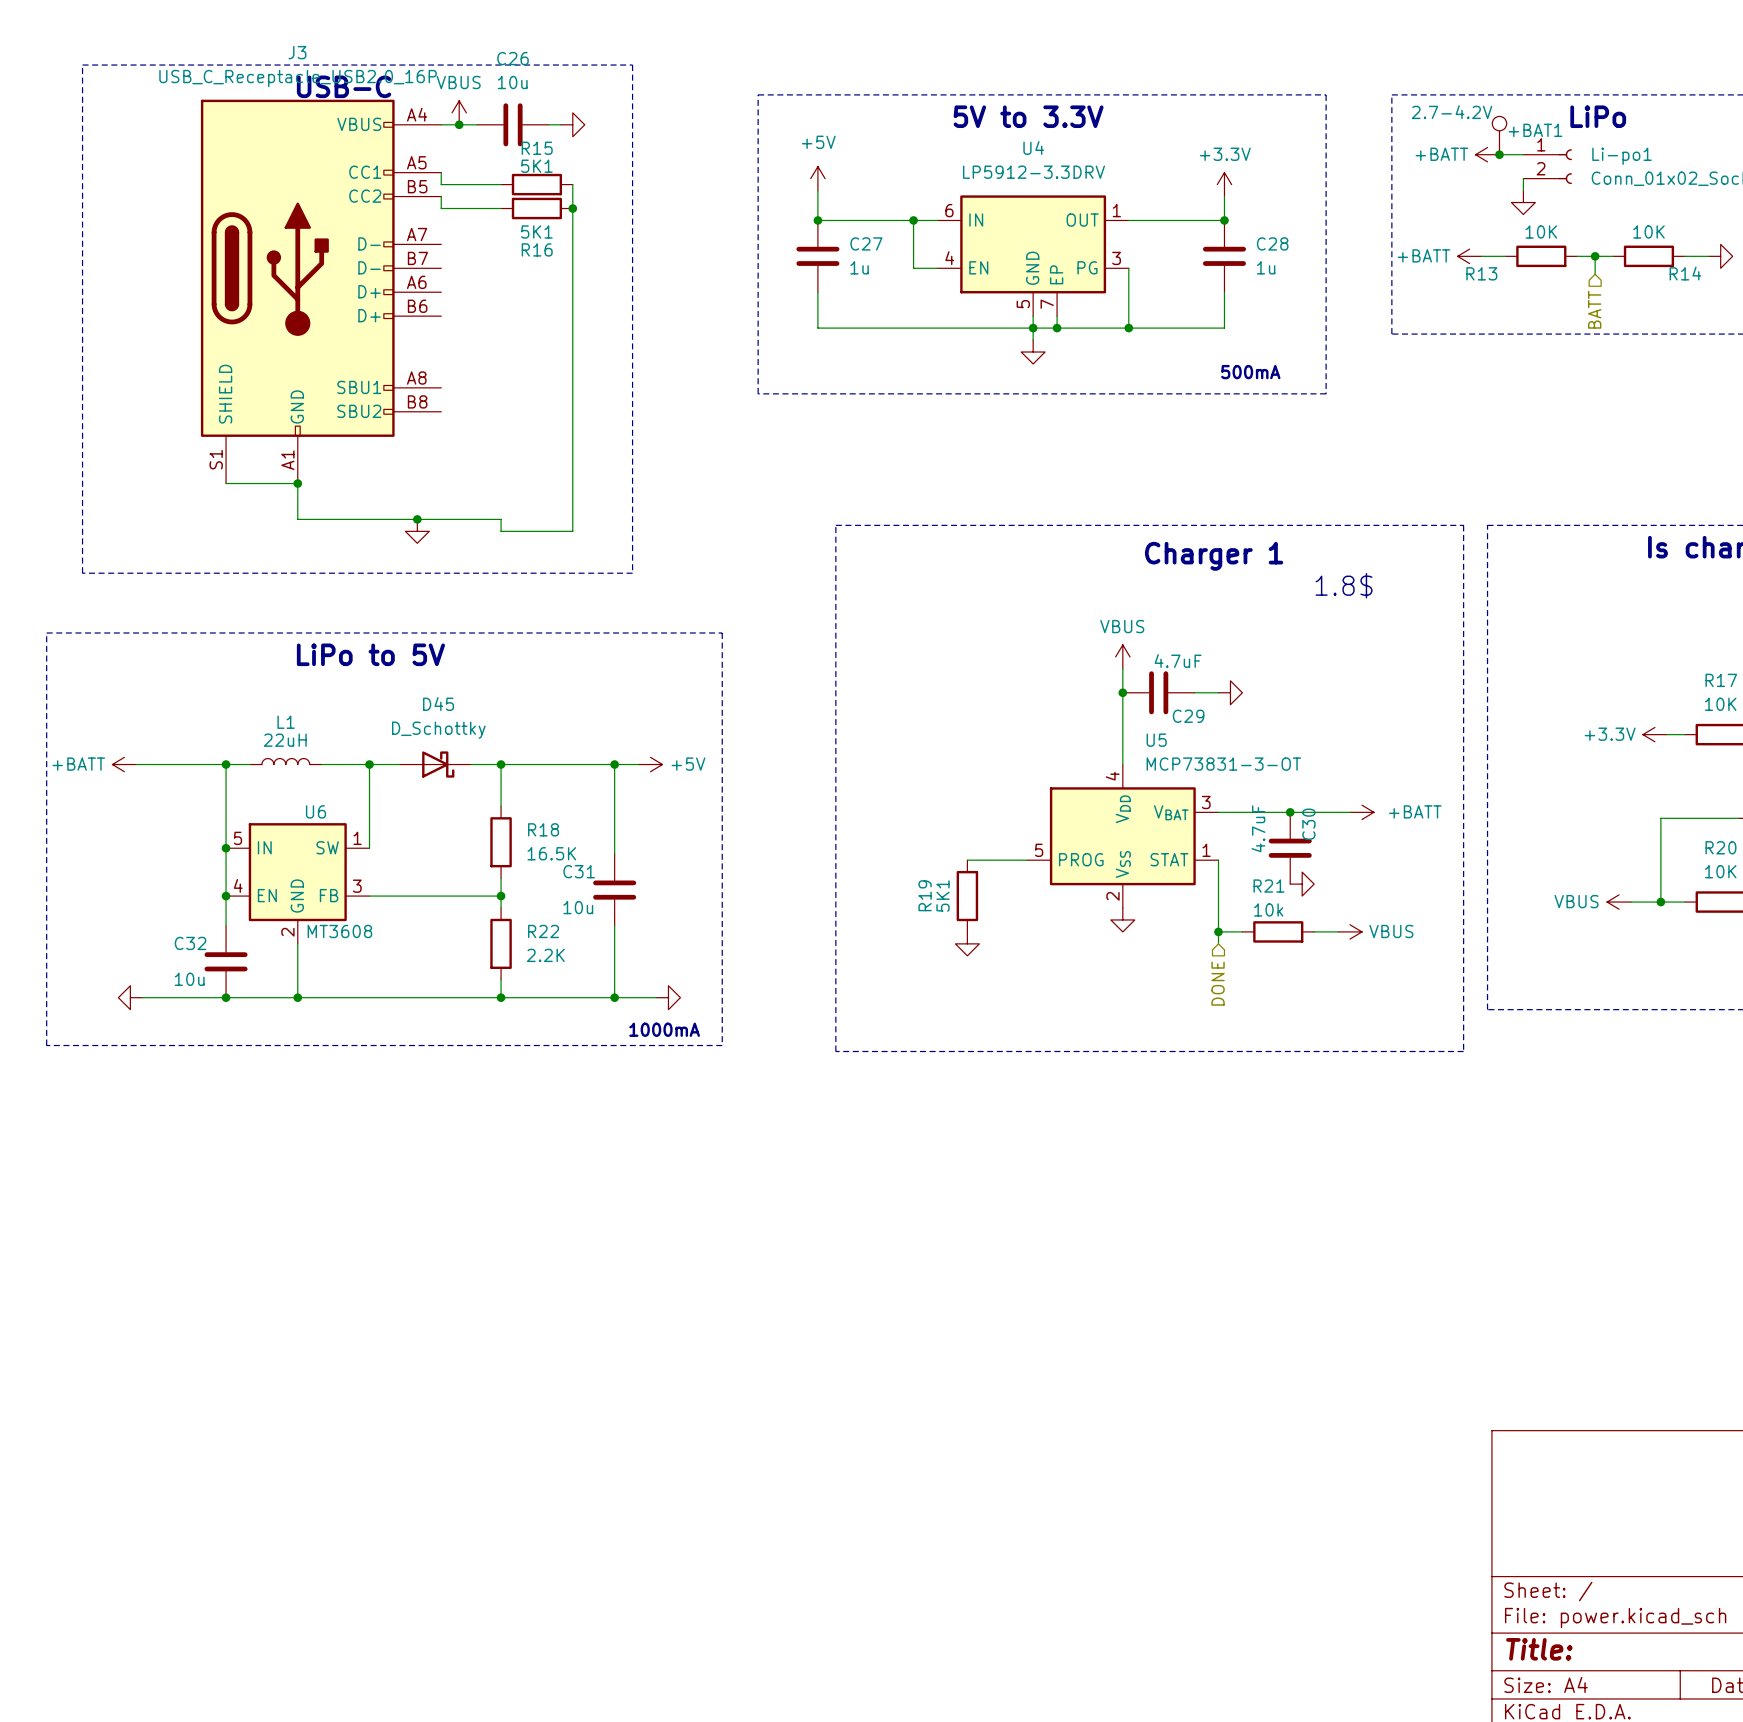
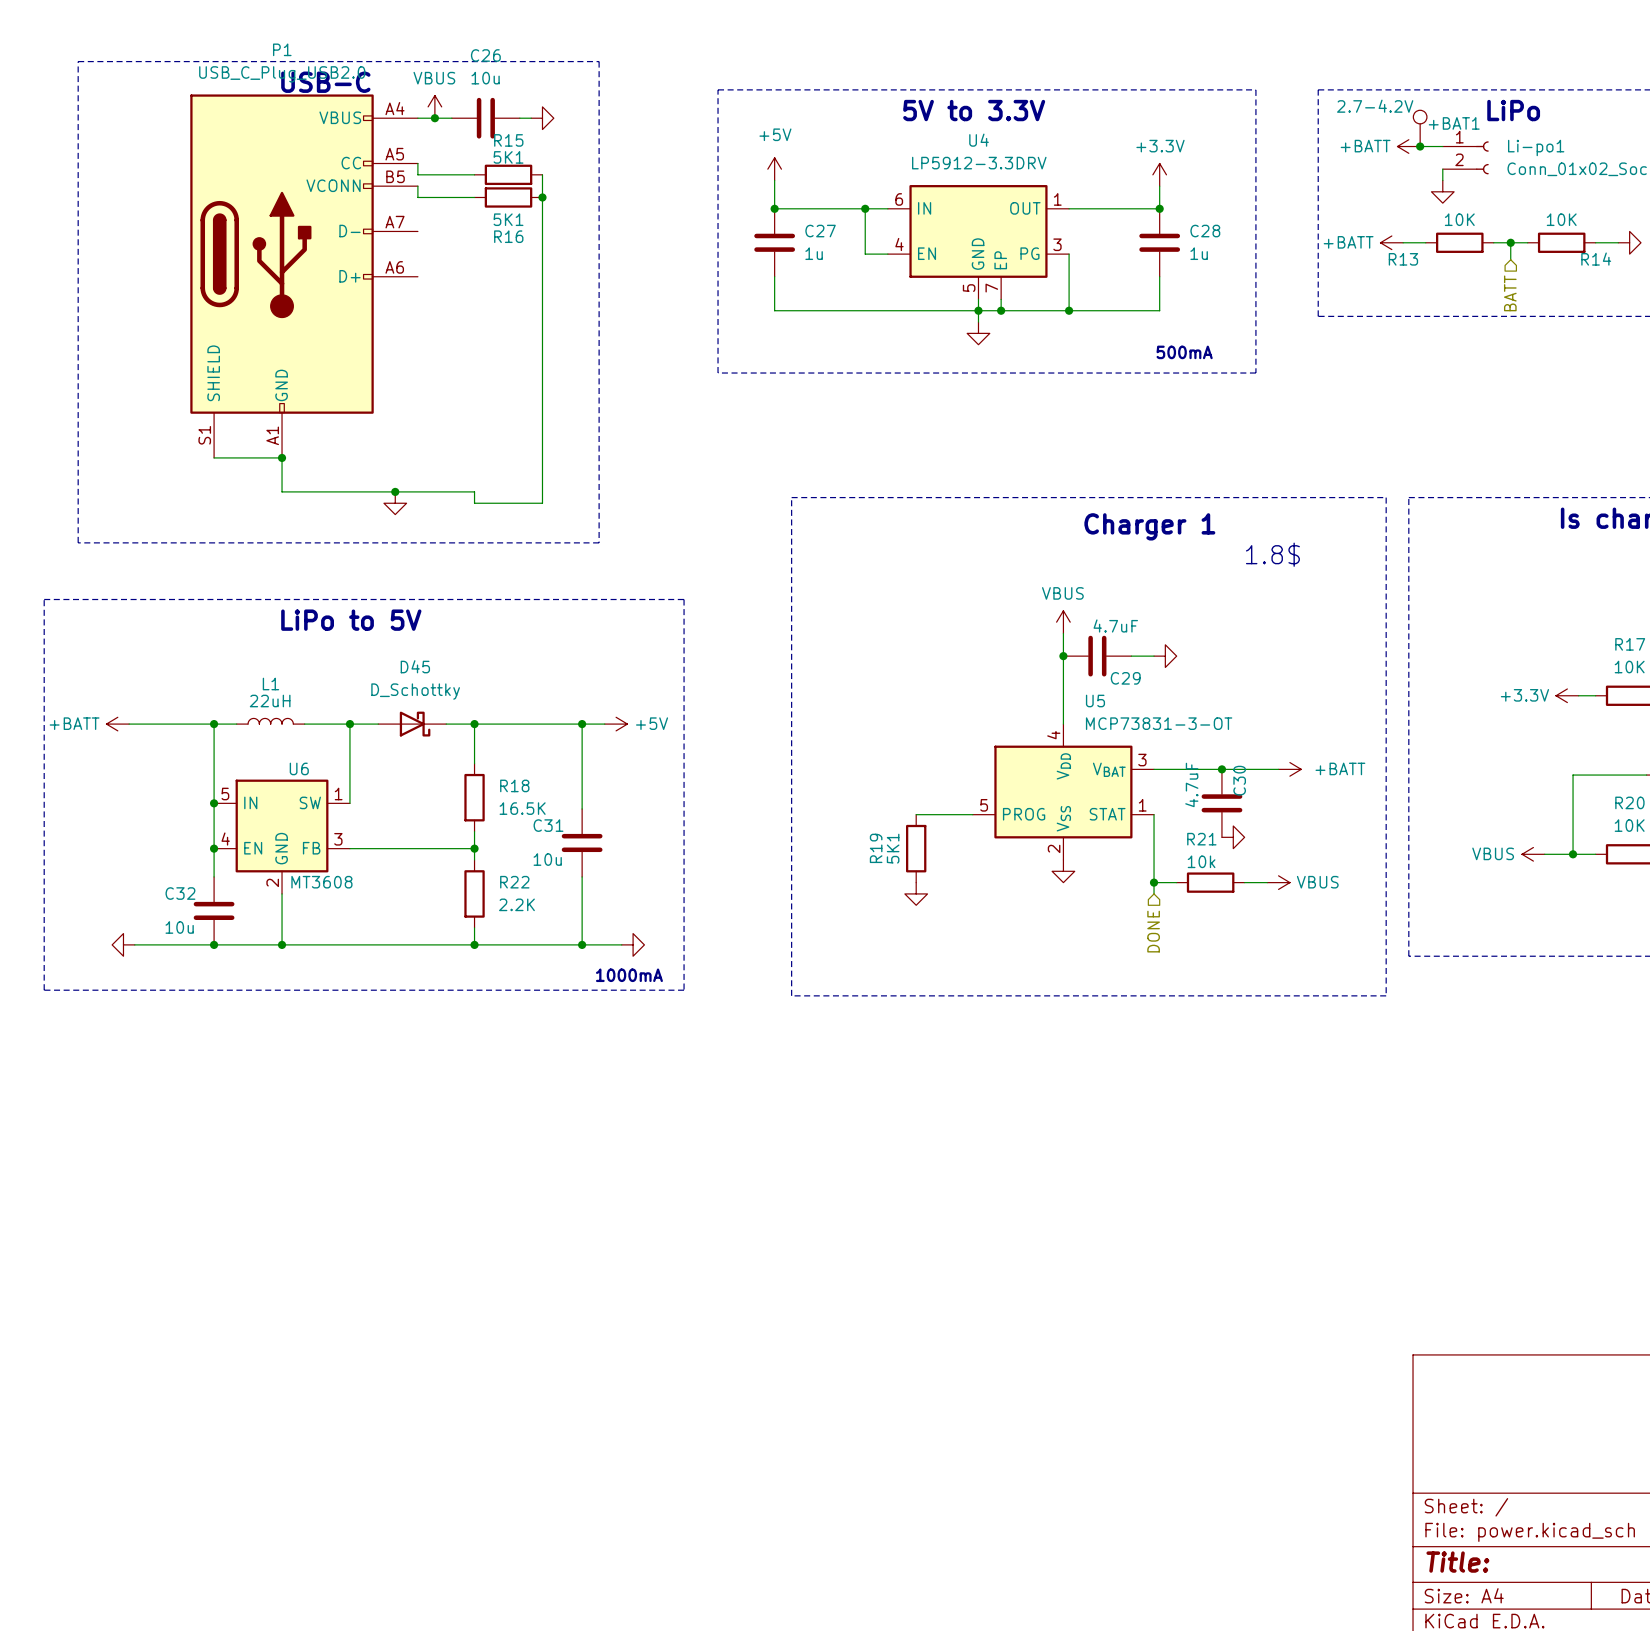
J3: USB_C_Receptacle_USB2.0_16P (321, 291) -> none
P1: none -> USB_C_Plug_USB2.0 (304, 276)

